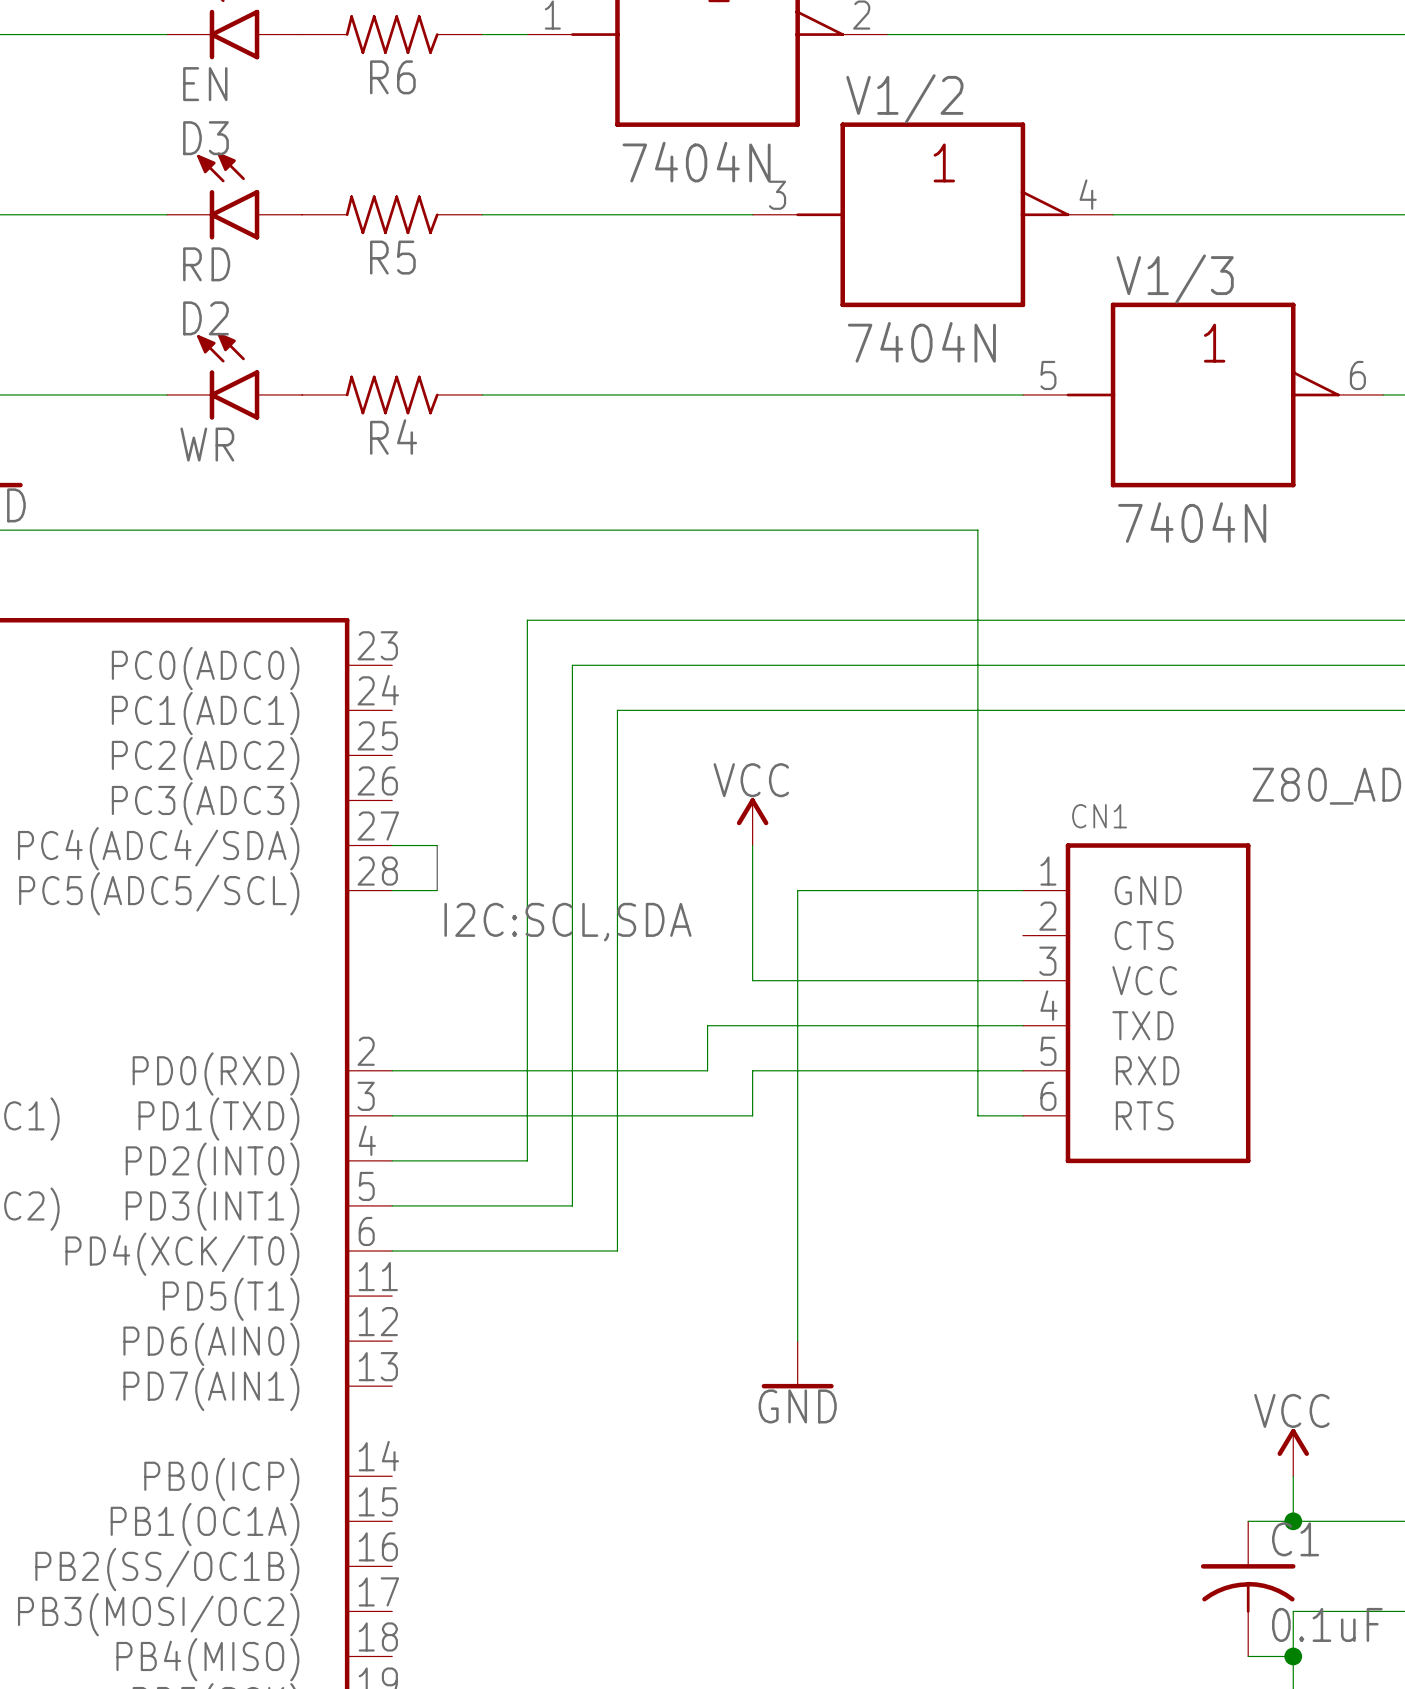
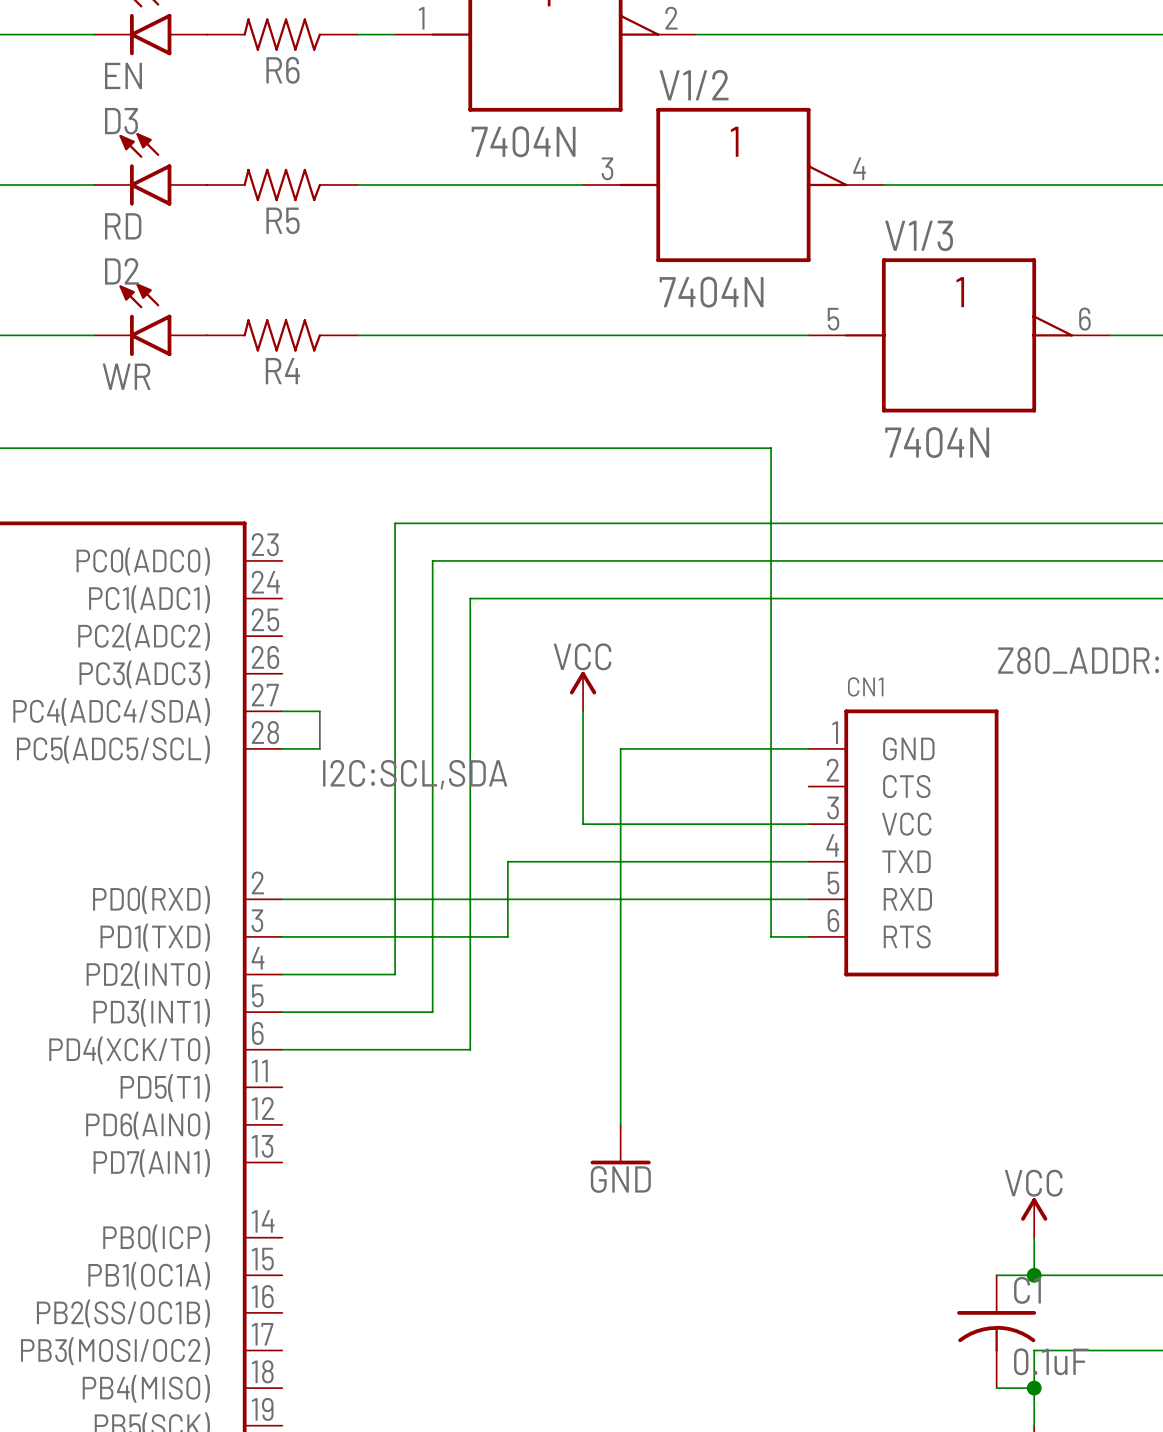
wire: (707, 1025) (707, 1070) -> (583, 899) (545, 899)
wire: (752, 1070) (752, 1115) (662, 1115) -> (545, 861) (507, 861) (507, 936)

